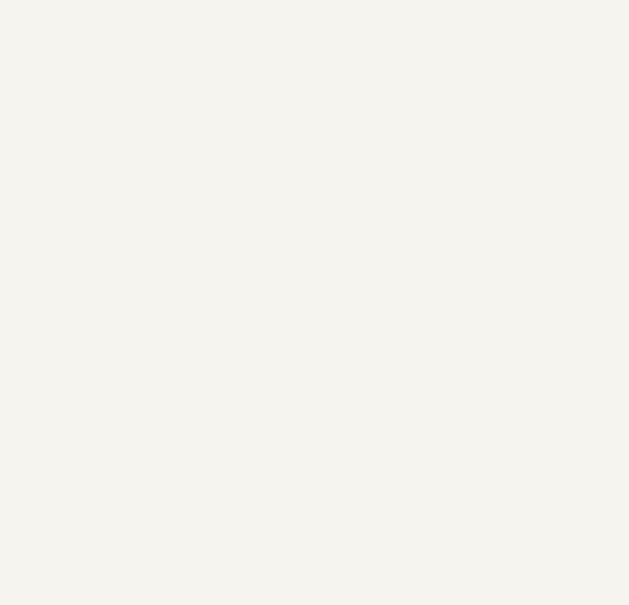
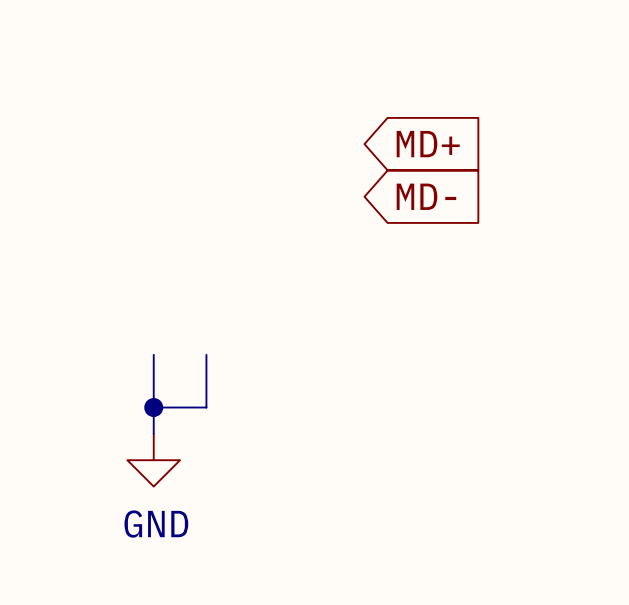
global label: none -> MD+ (428, 144)
global label: none -> MD- (426, 196)
wire: none -> (153, 354) (153, 433)
wire: none -> (206, 354) (206, 407) (153, 407)
junction: none -> (153, 407)
power symbol: none -> GND (153, 460)

